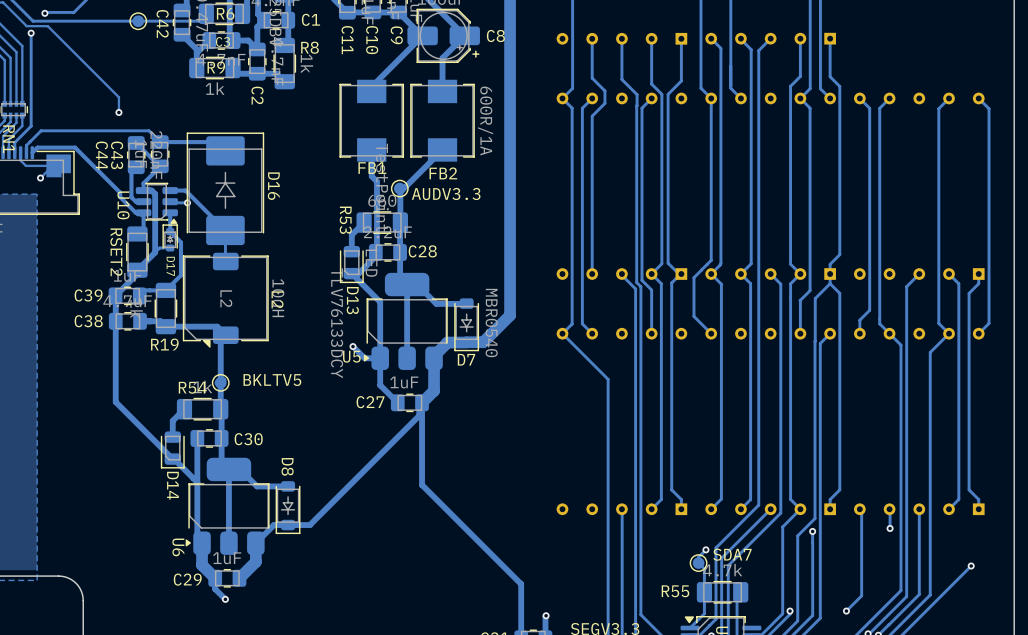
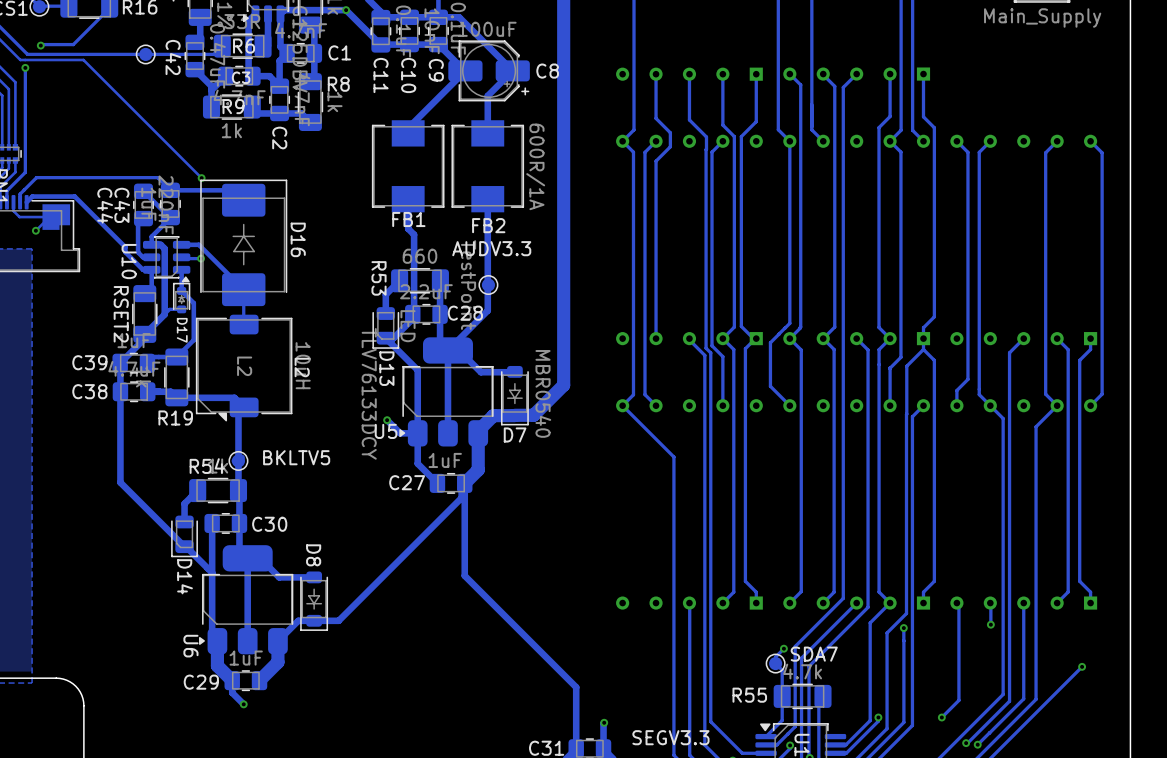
track: (47, 26) (118, 97) (118, 112) -> (44, 59) (83, 59) (201, 178)
via: (118, 112) -> none
via: none -> (201, 178)
track: (442, 149) (400, 192) (400, 222) -> (487, 199) (487, 310) (447, 350)
AUDV3.3 position: (399, 188) -> (488, 285)

